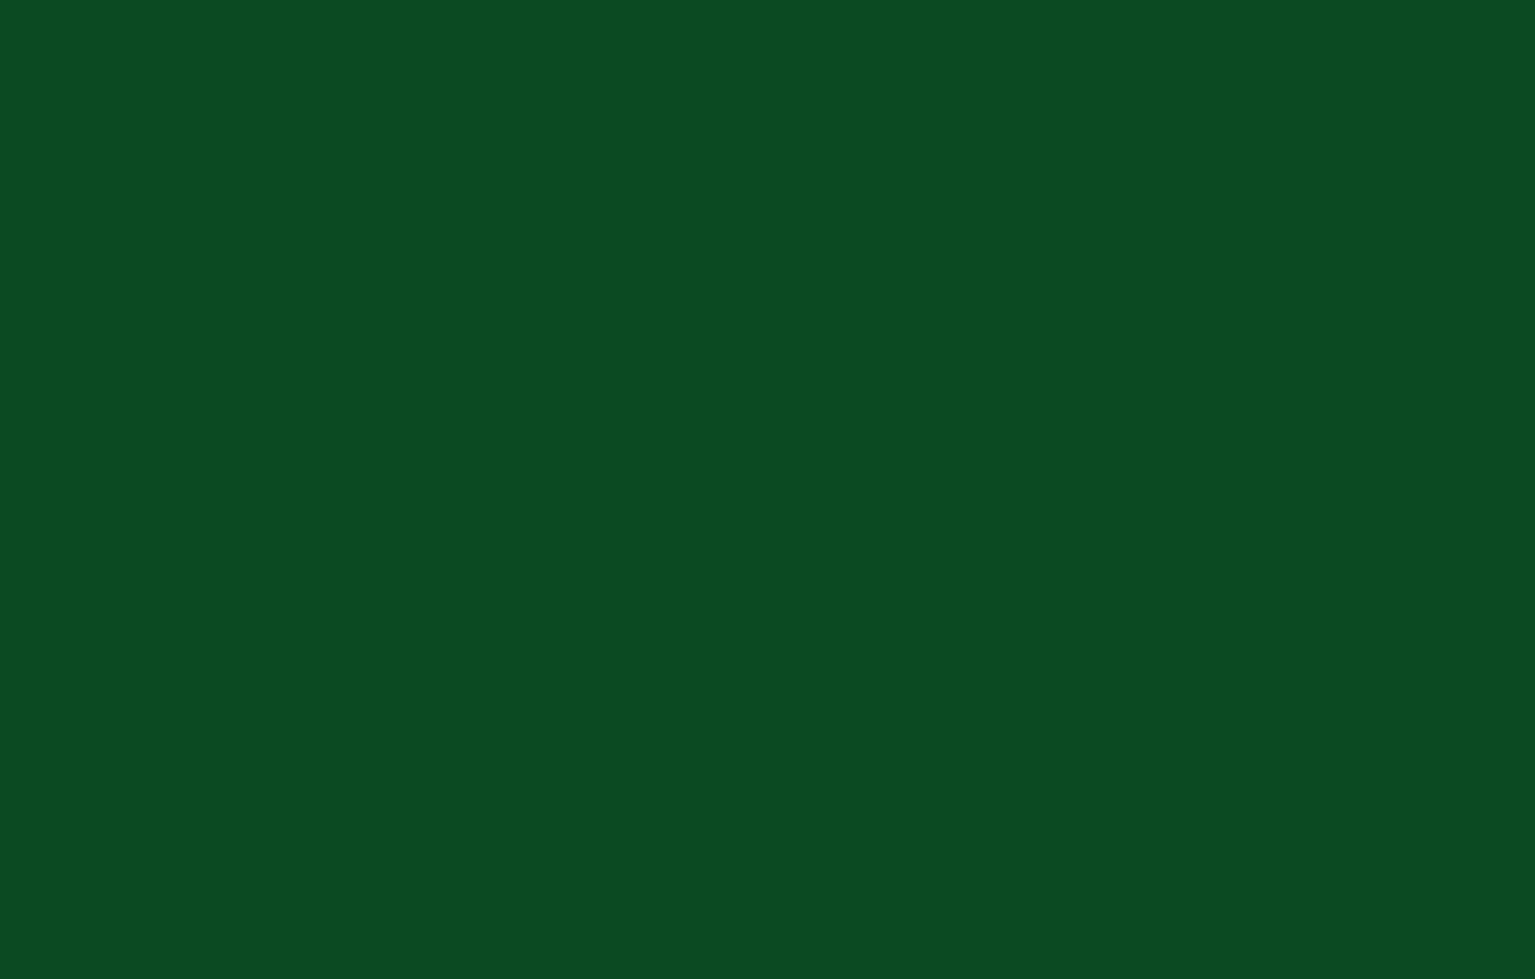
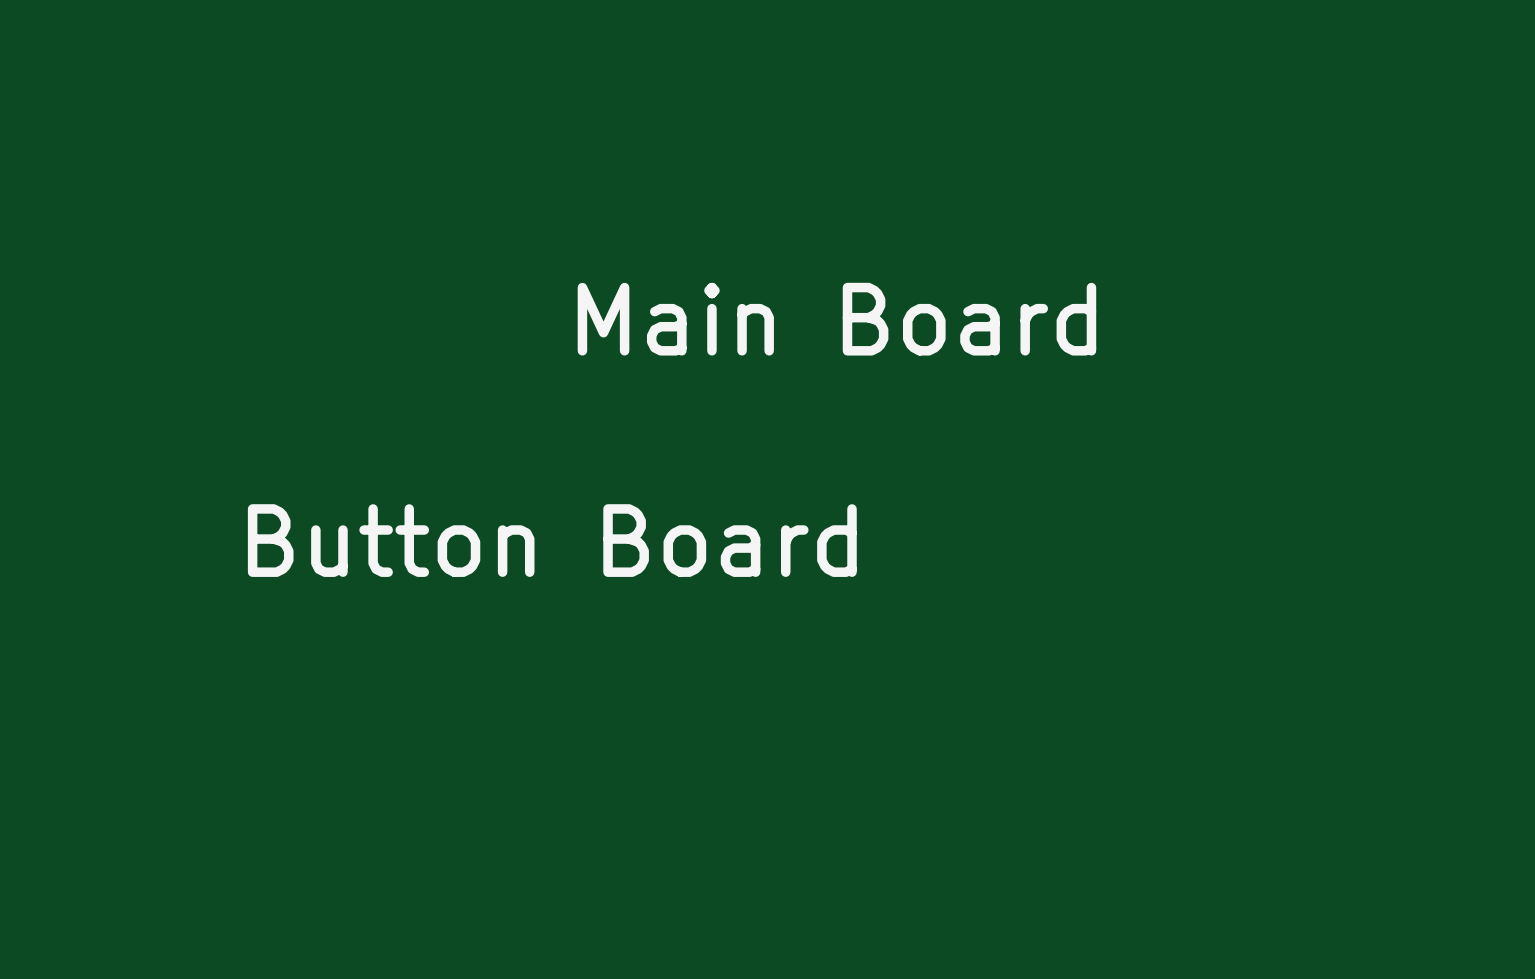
text: none -> Main Board (836, 319)
text: none -> Button Board (552, 540)

